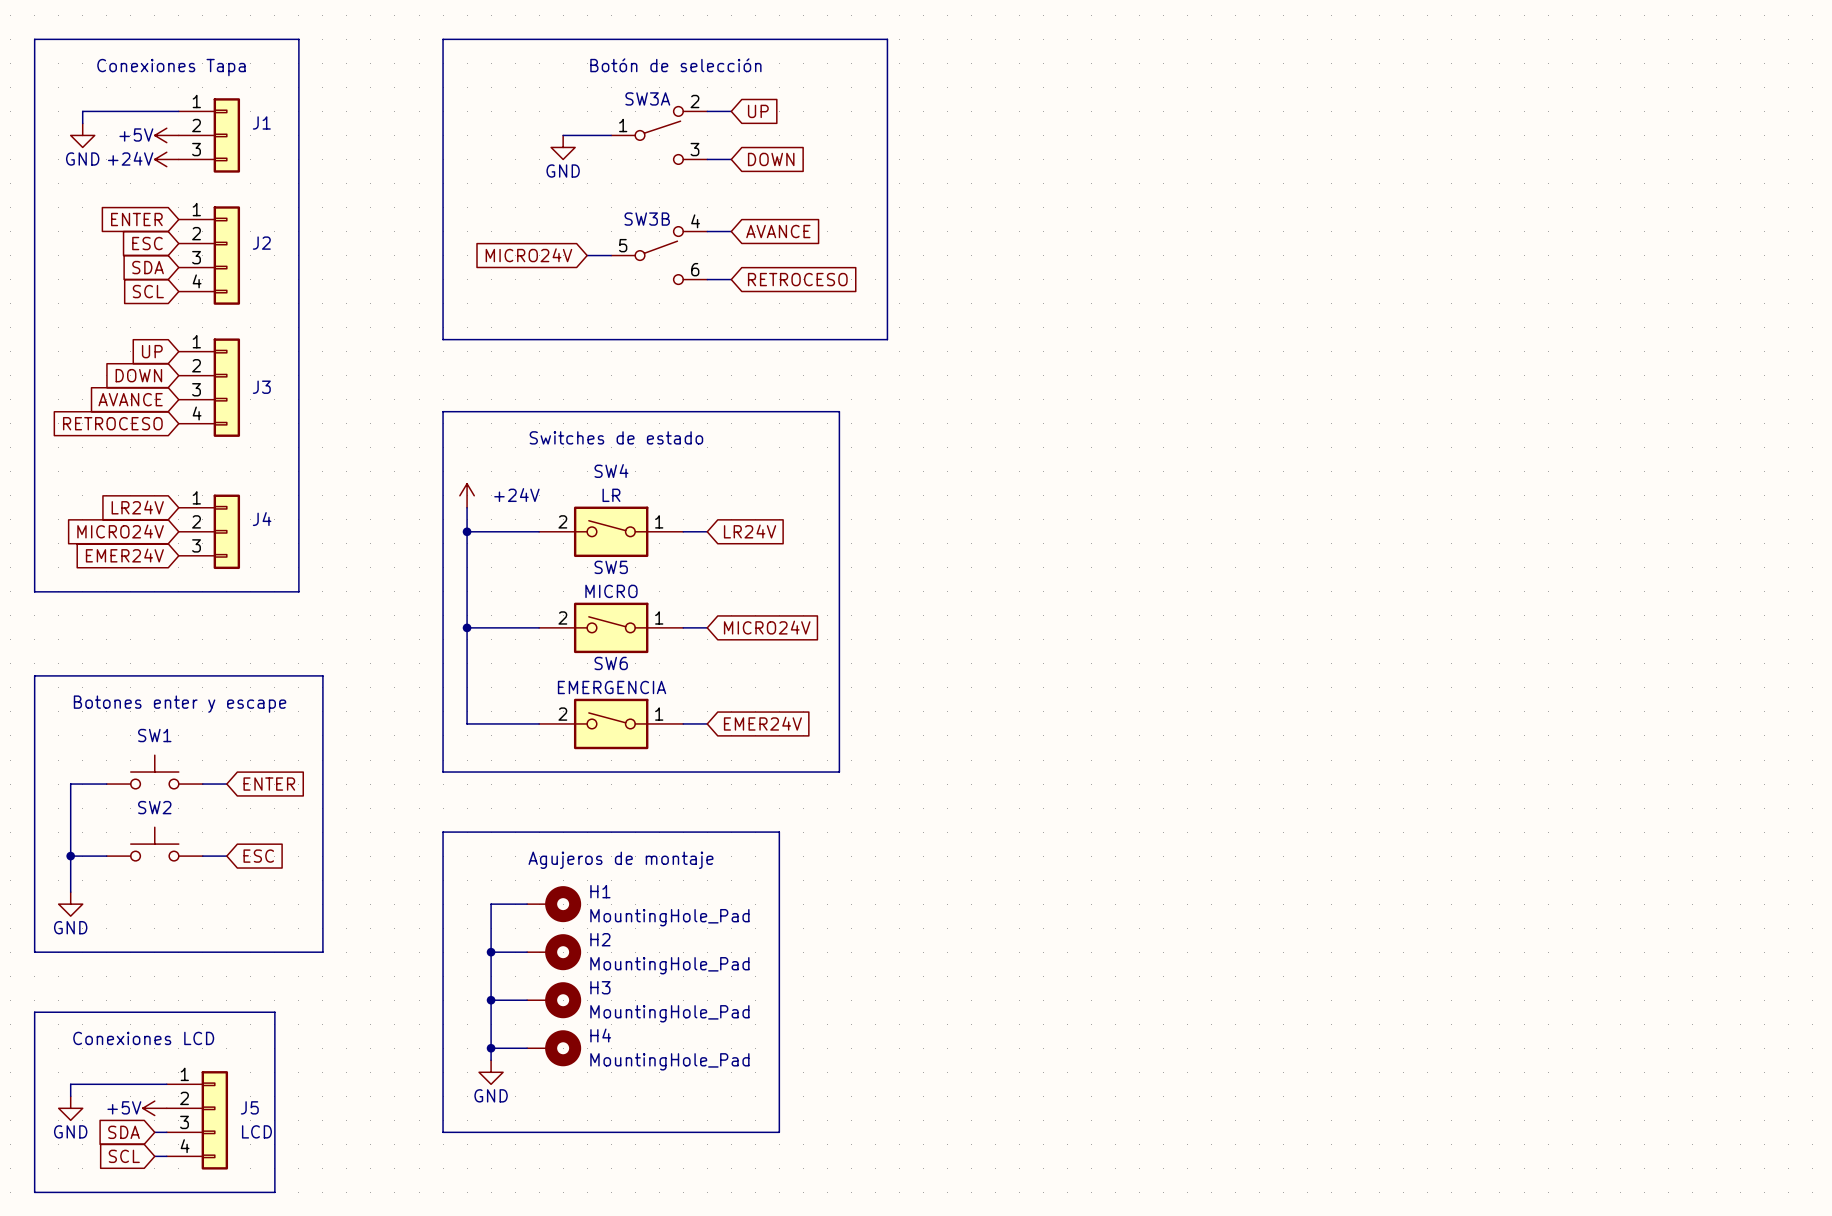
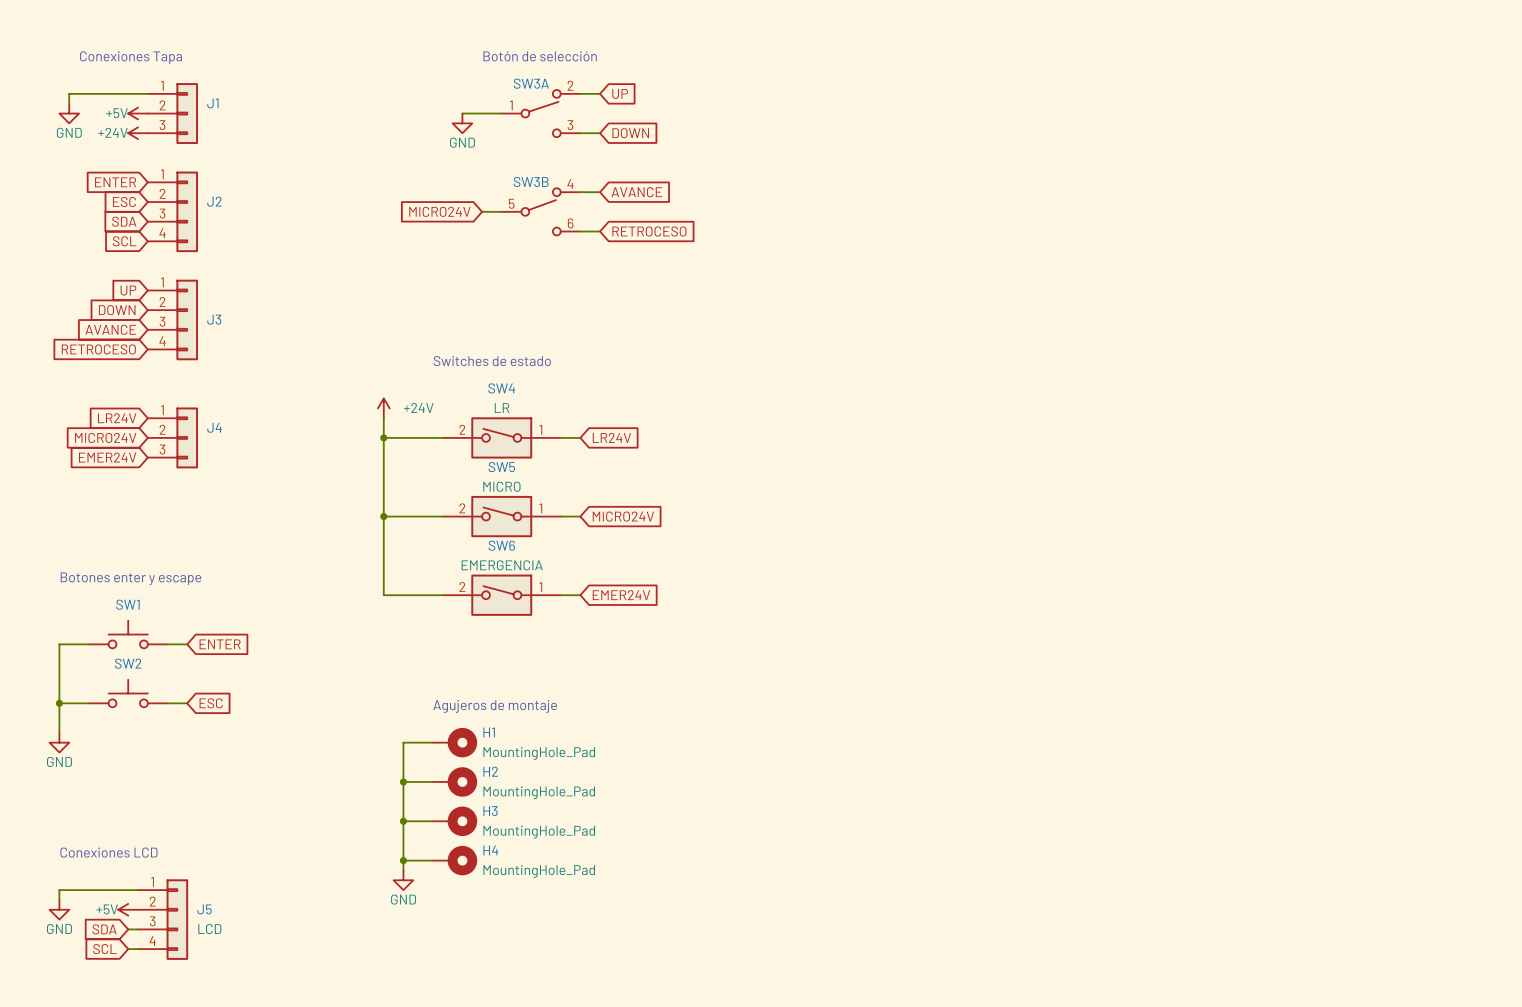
line: (34, 39) (34, 591) (298, 591) (298, 39) (34, 39) -> none
line: (443, 39) (443, 339) (887, 339) (887, 39) (443, 39) -> none
line: (443, 411) (443, 772) (839, 772) (839, 411) (443, 411) -> none
line: (34, 675) (34, 952) (322, 952) (322, 675) (34, 675) -> none
line: (443, 832) (443, 1132) (779, 1132) (779, 832) (443, 832) -> none
line: (34, 1012) (34, 1192) (274, 1192) (274, 1012) (34, 1012) -> none

